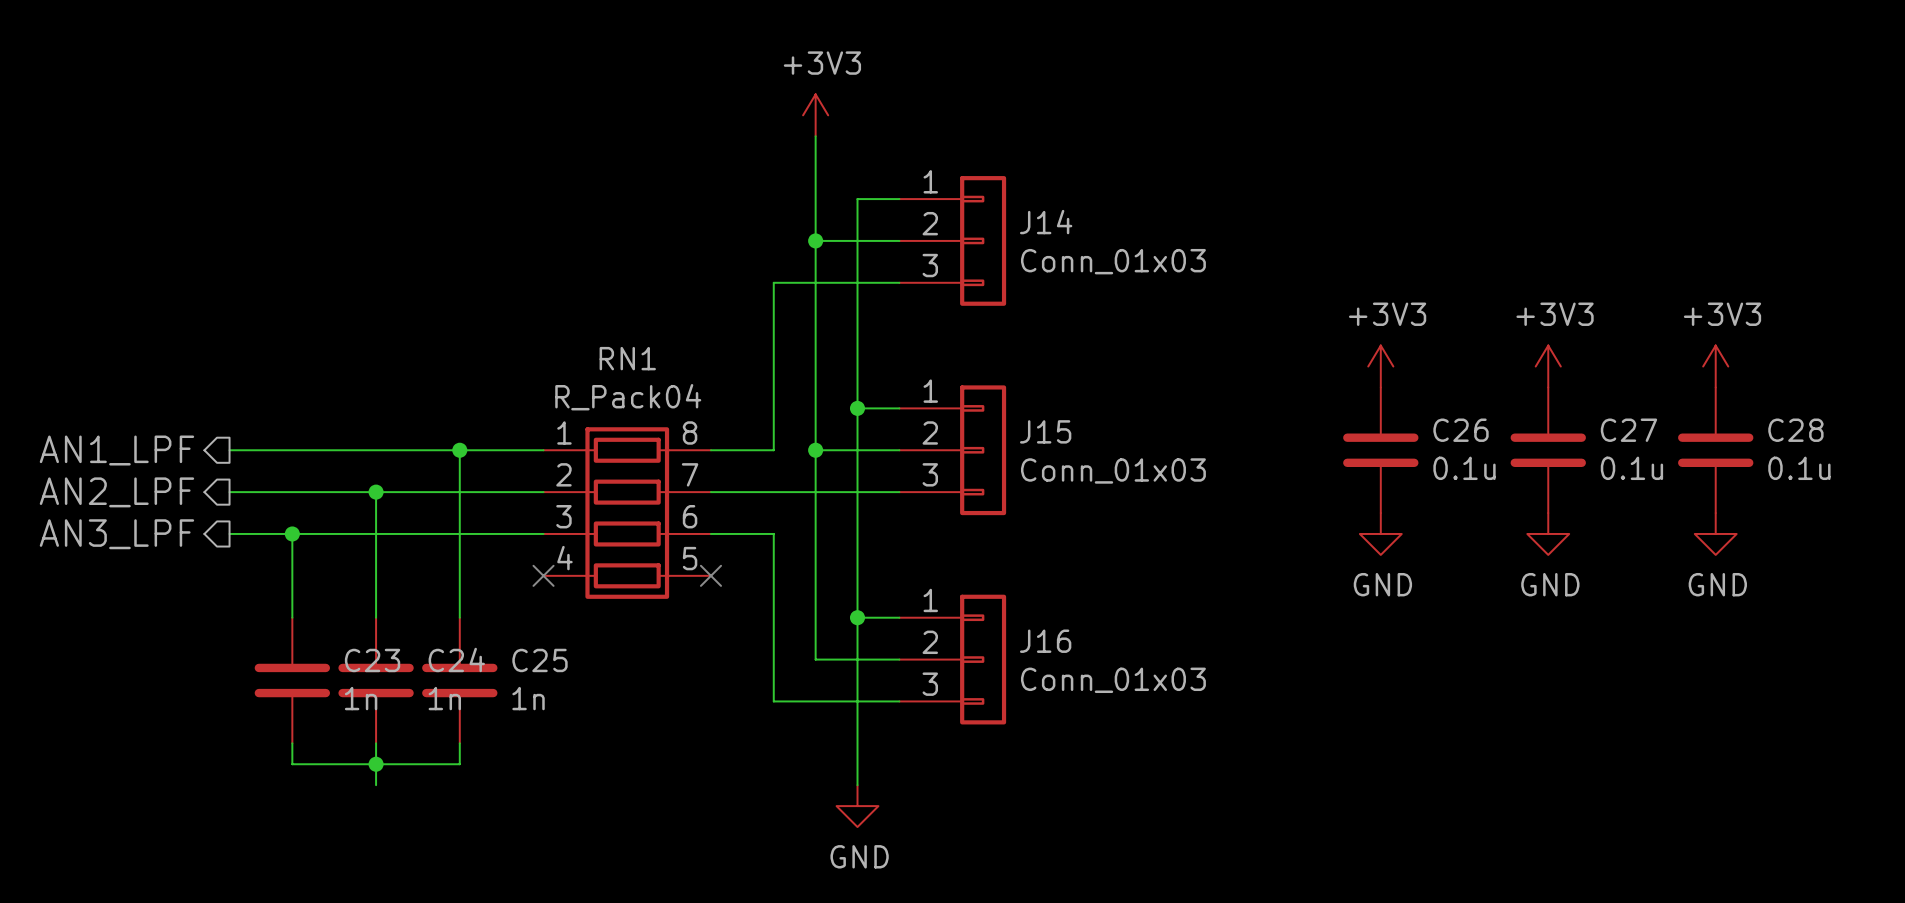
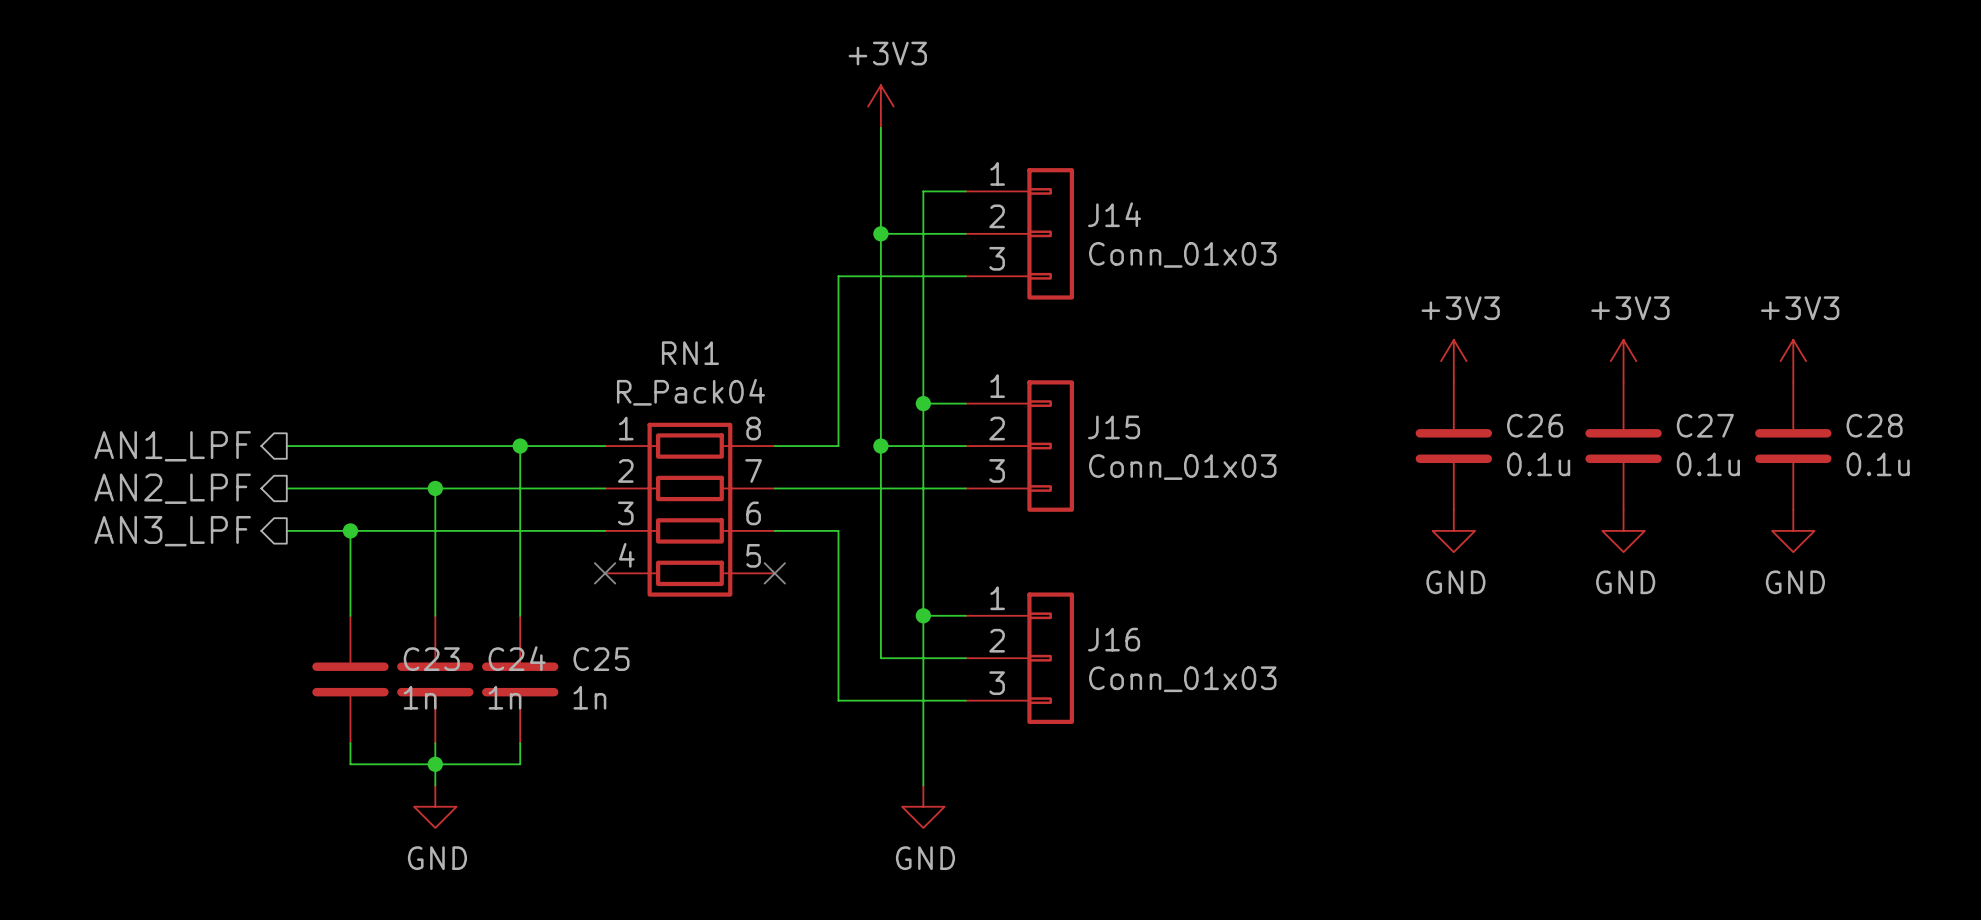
power symbol: none -> GND (435, 806)

